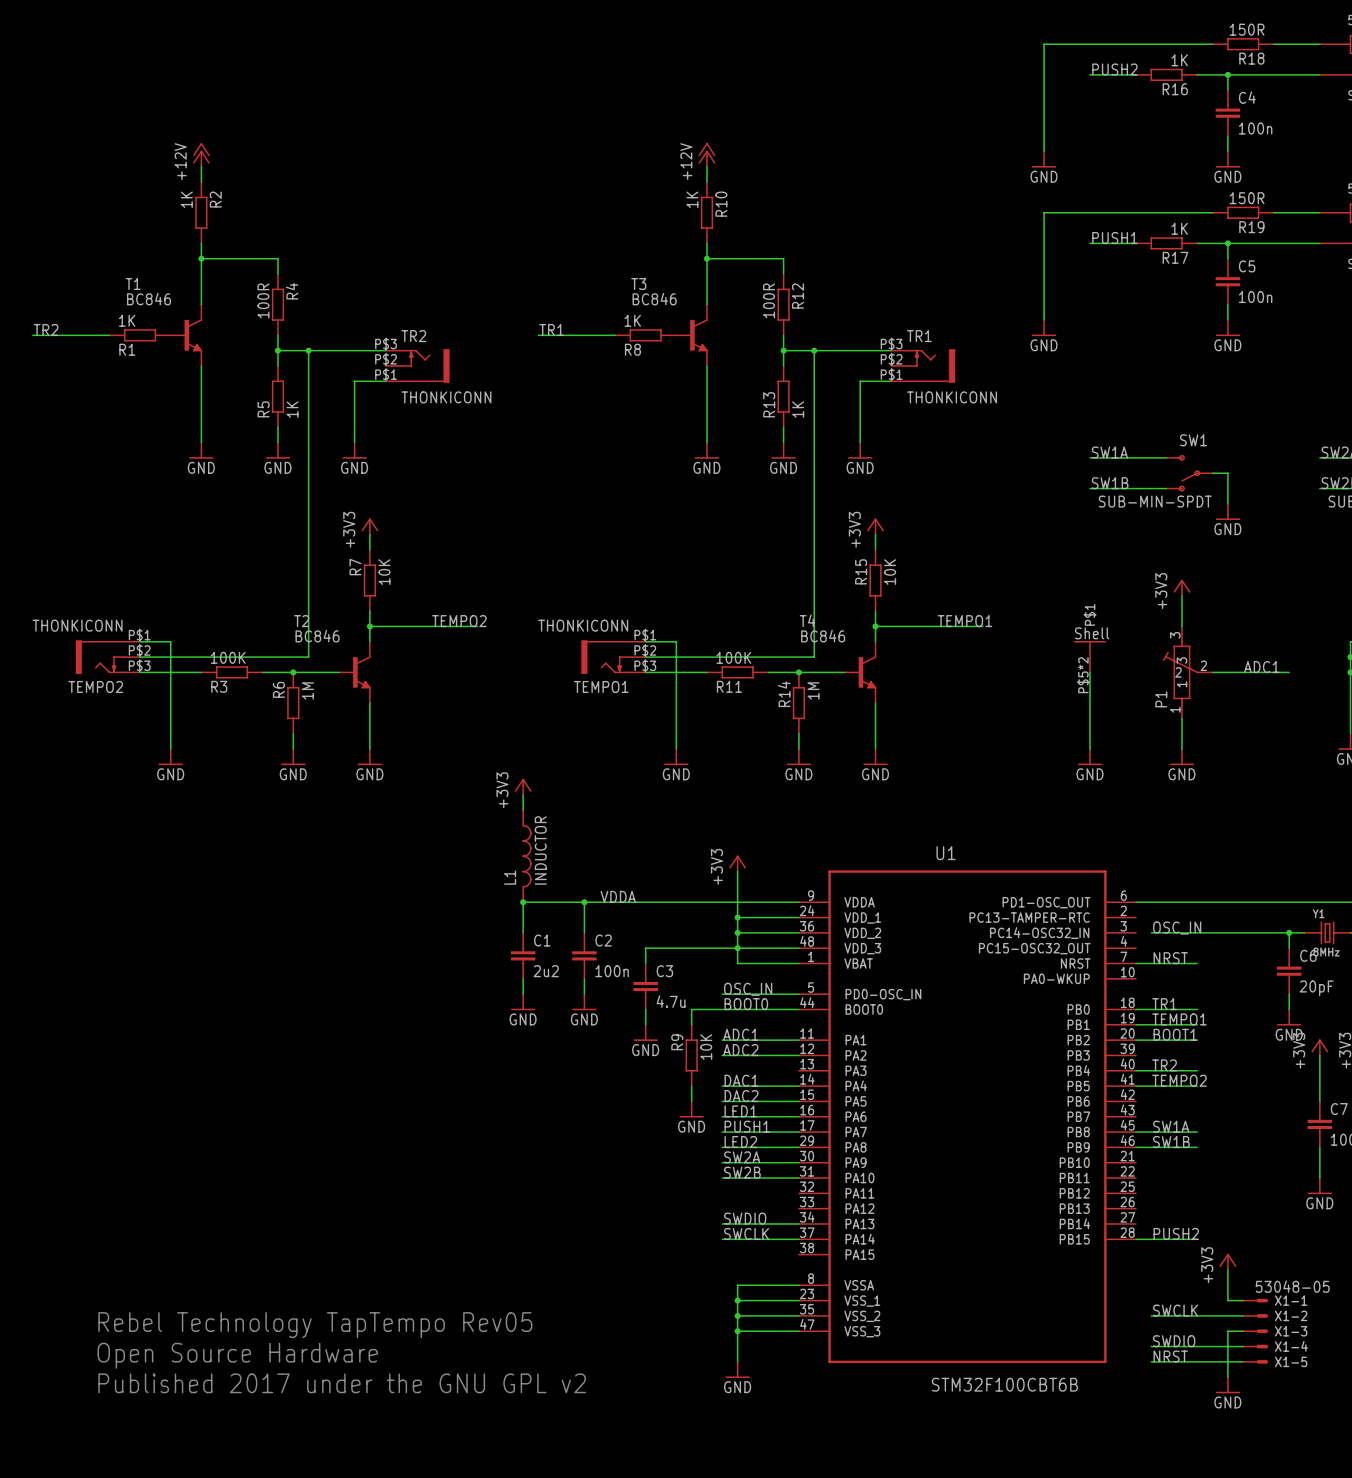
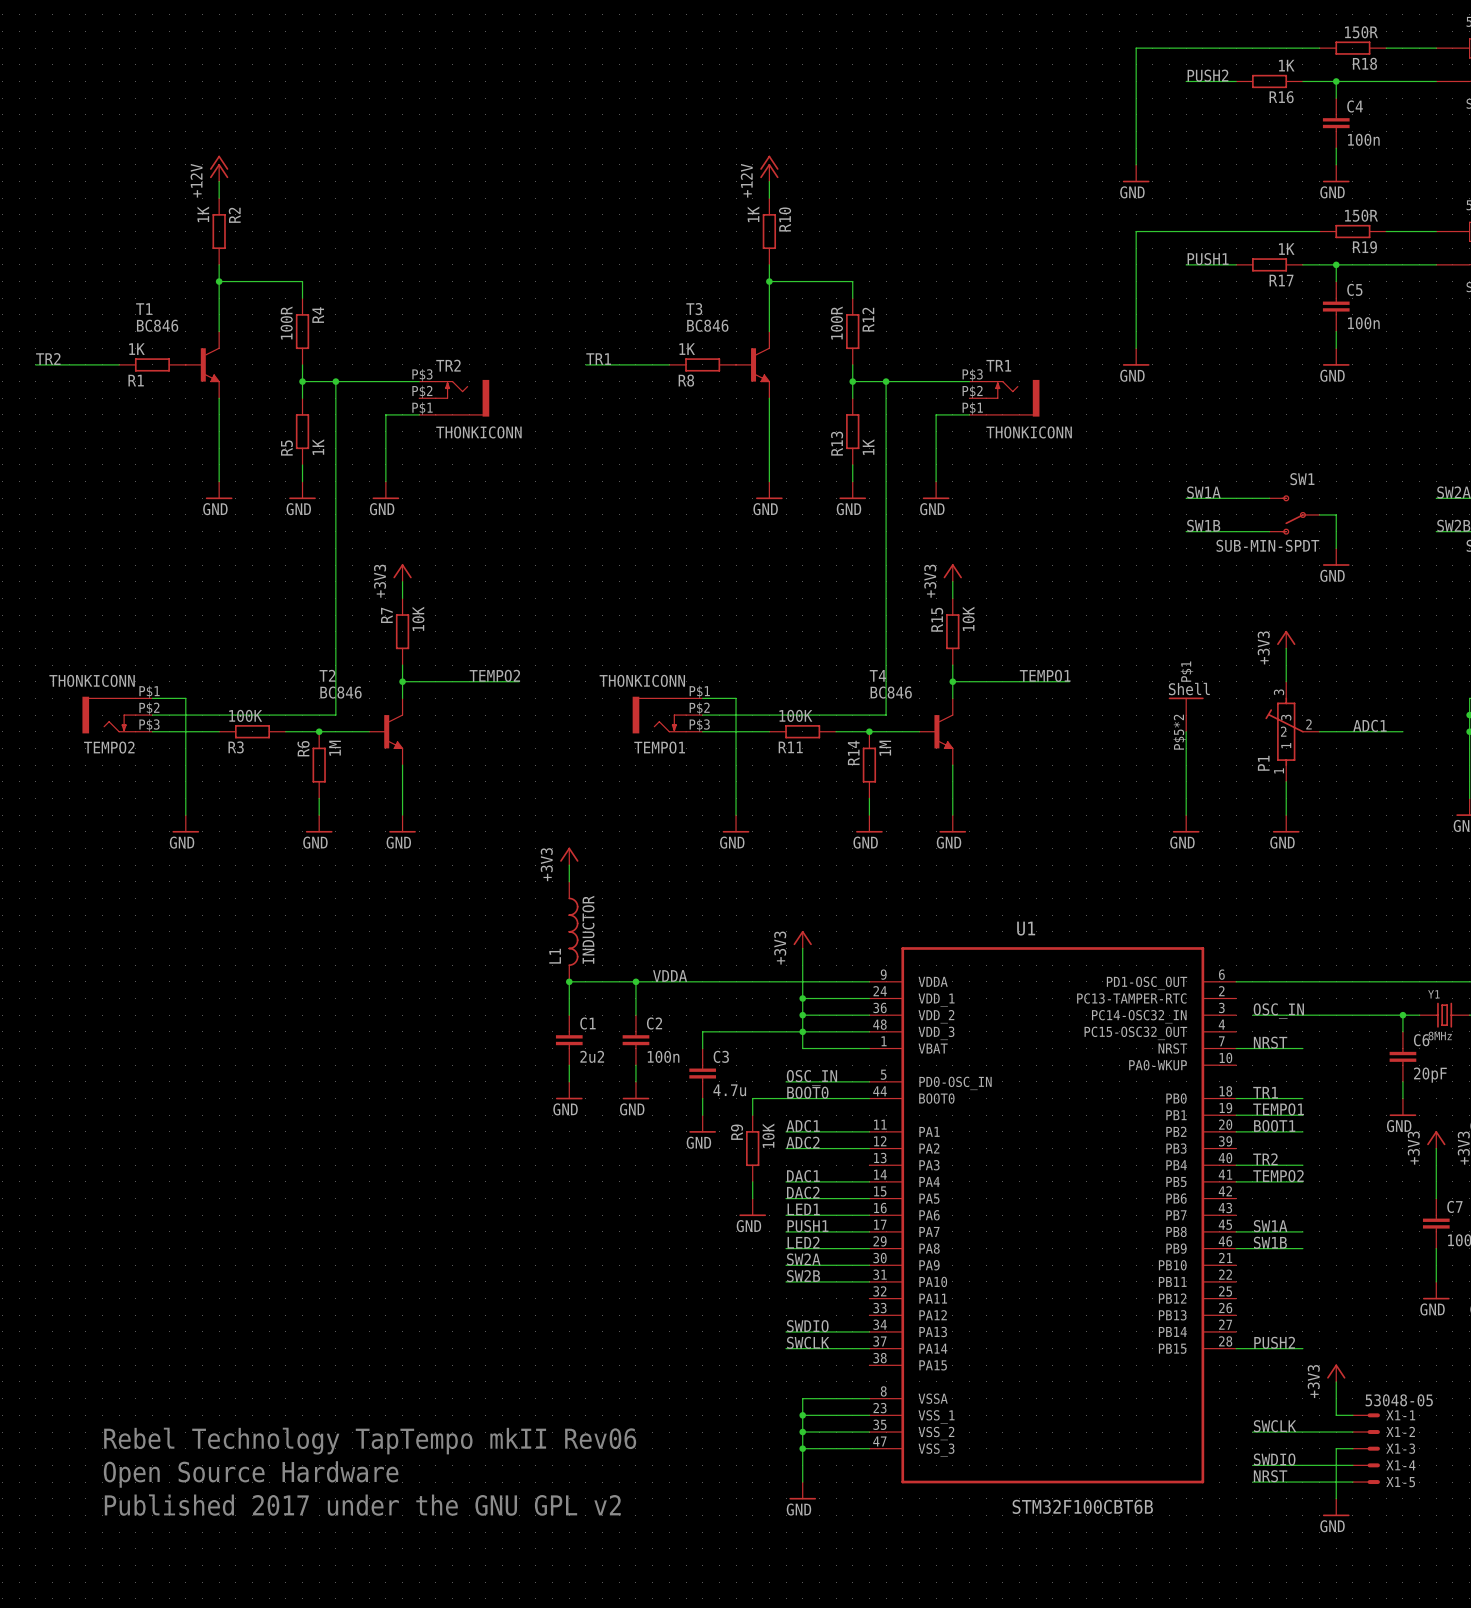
text: Rebel Technology TapTempo Rev05 (315, 1325) -> Rebel Technology TapTempo mkII Rev06 (370, 1441)

